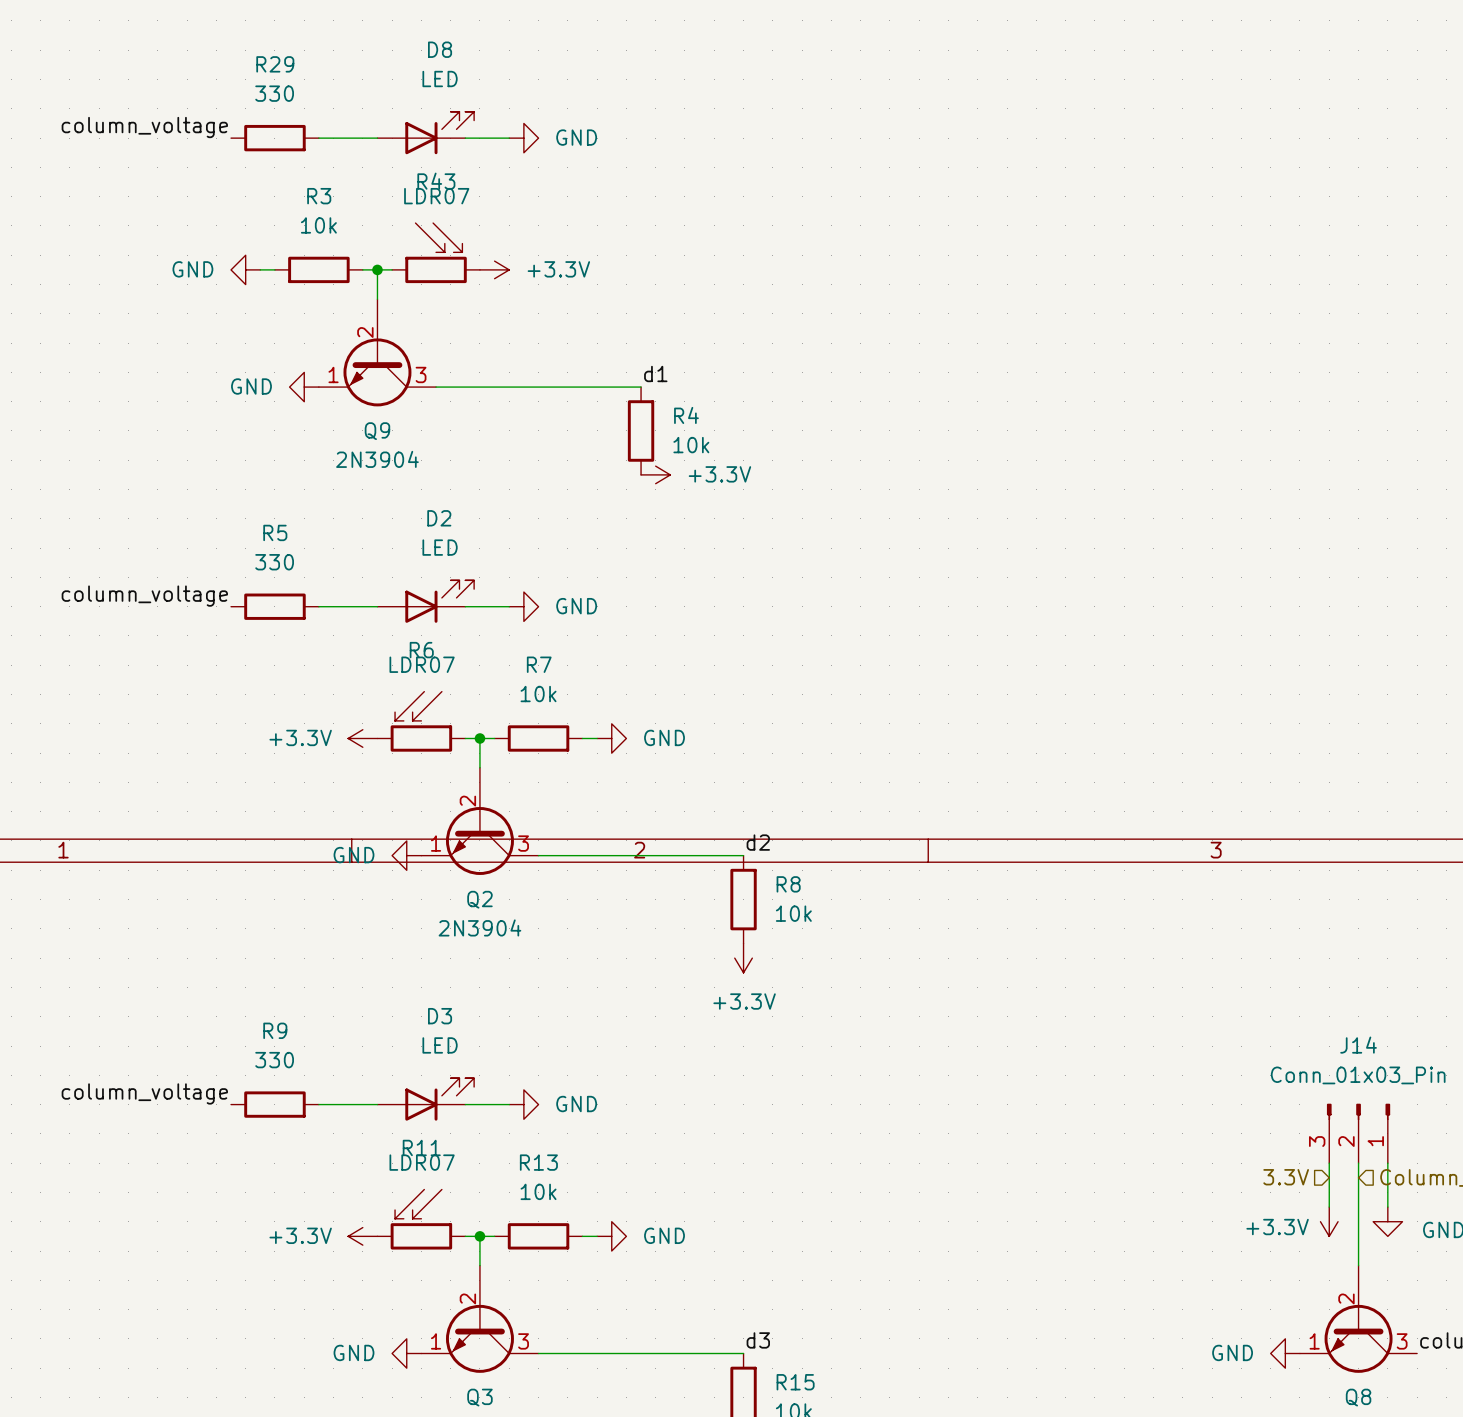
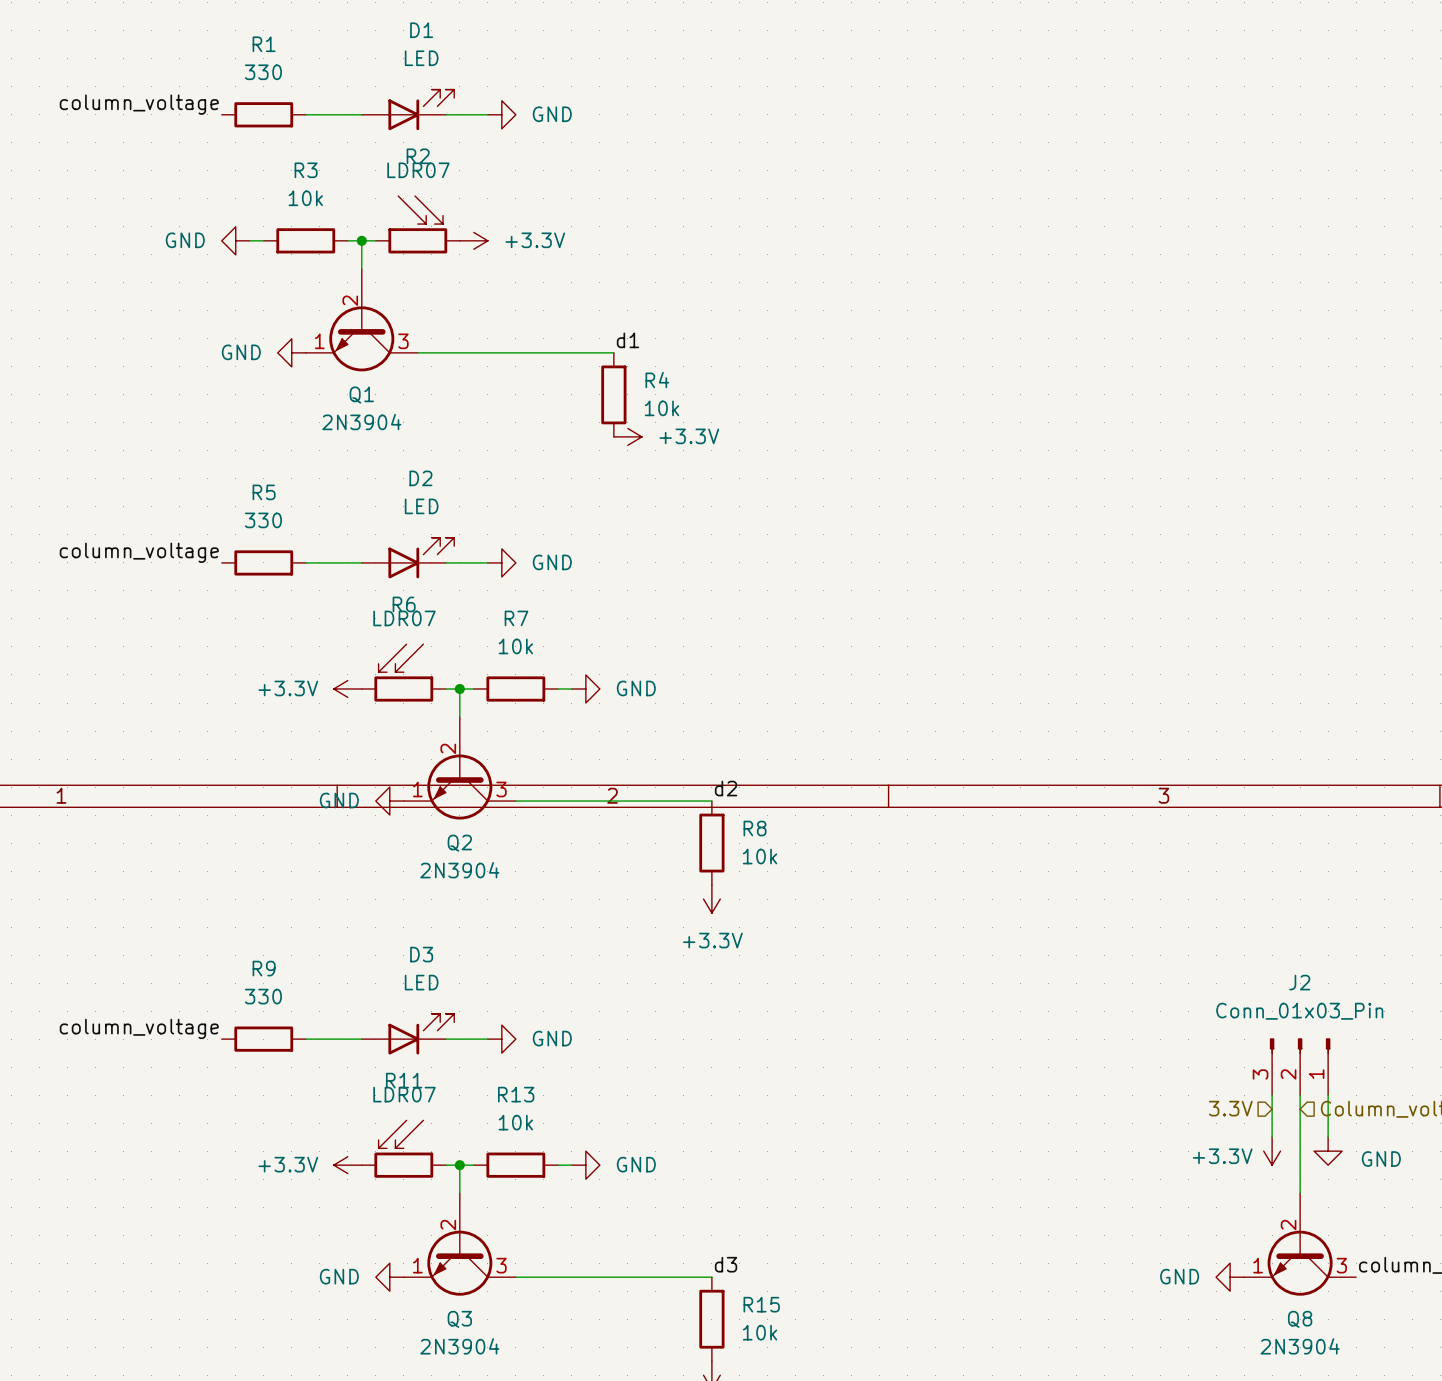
D8 name: D8 (440, 49) -> D1 (421, 30)
R29 name: R29 (275, 64) -> R1 (264, 44)
R43 name: R43 (436, 181) -> R2 (418, 156)
Q9 name: Q9 (377, 431) -> Q1 (361, 395)
J14 name: J14 (1358, 1045) -> J2 (1299, 982)

